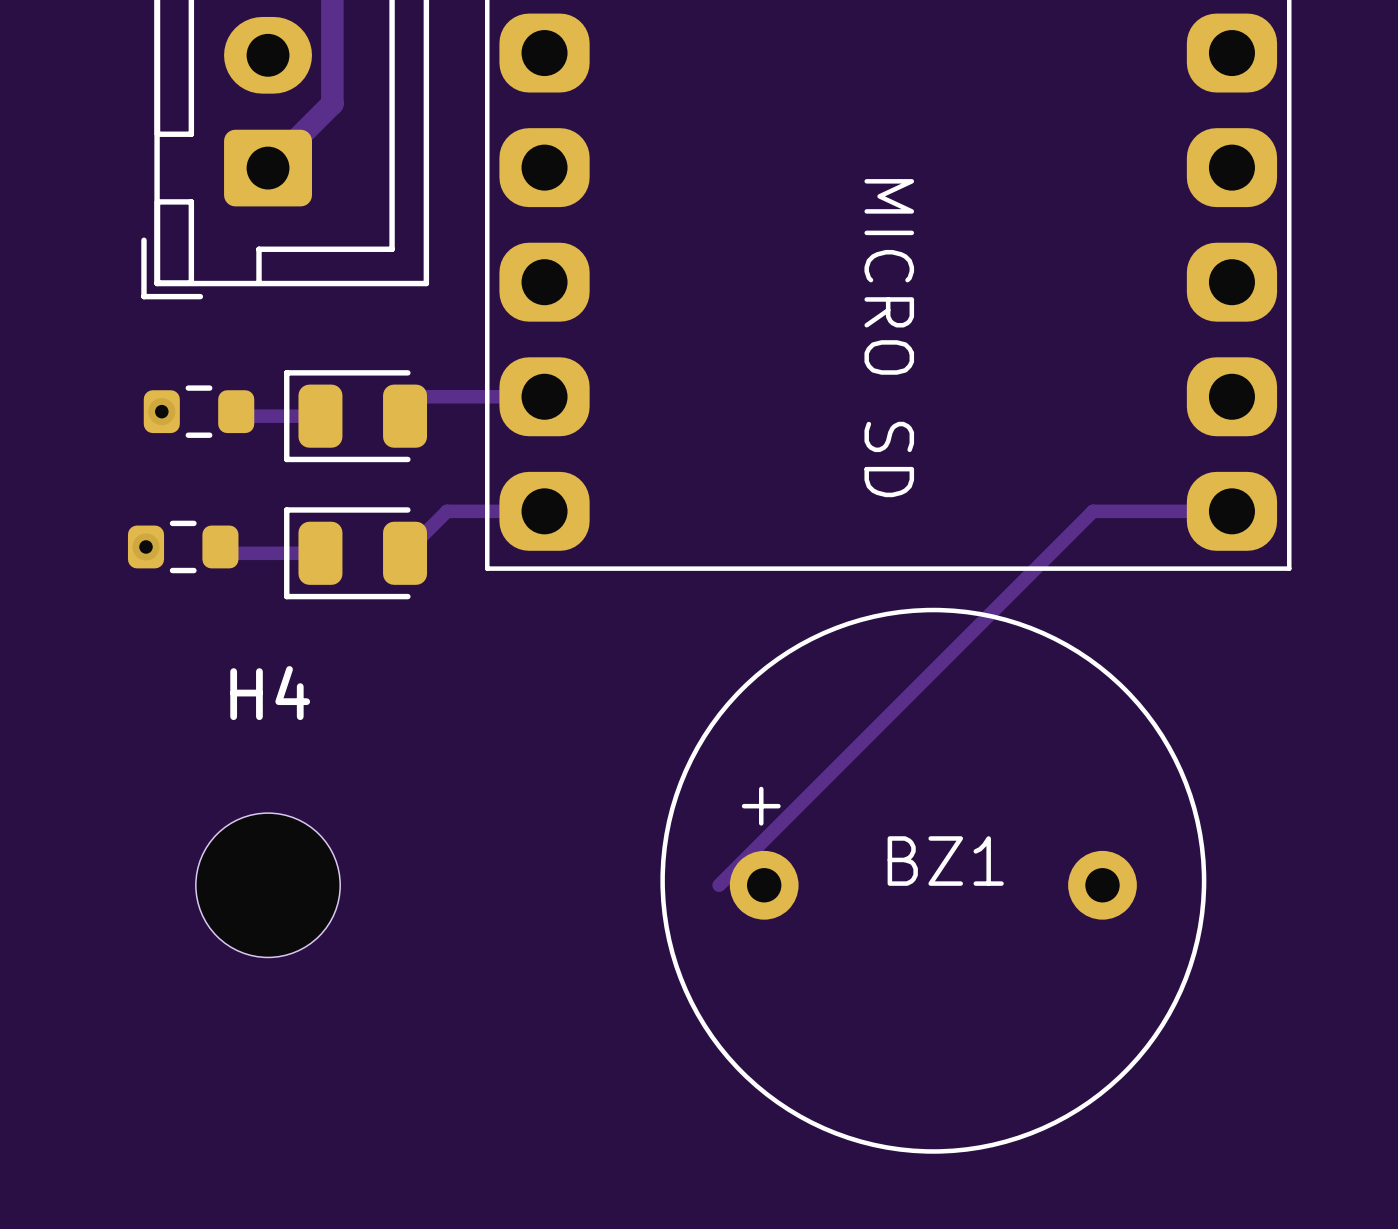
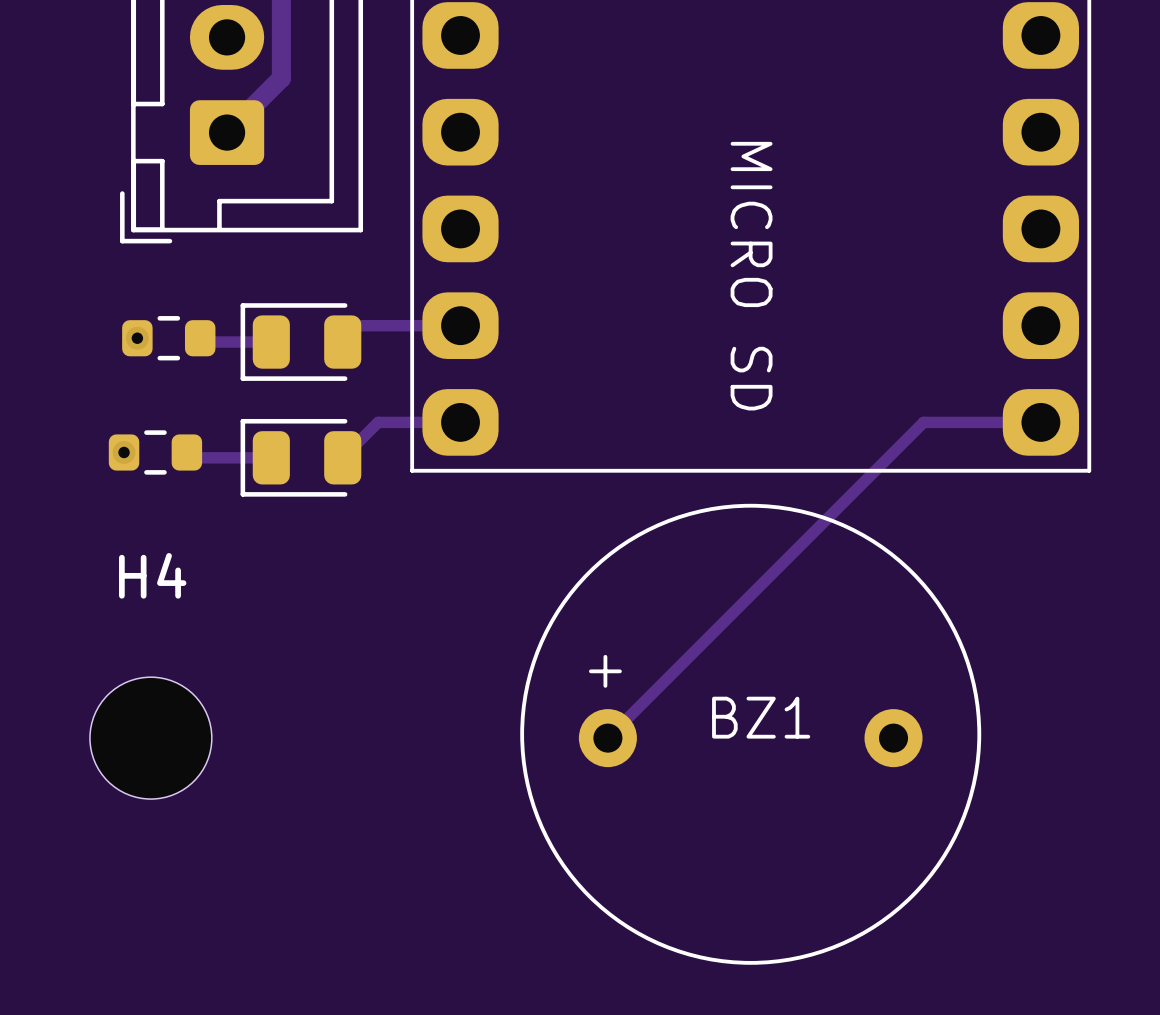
BZ1 position: (933, 880) -> (750, 734)
H4 position: (268, 885) -> (150, 738)

